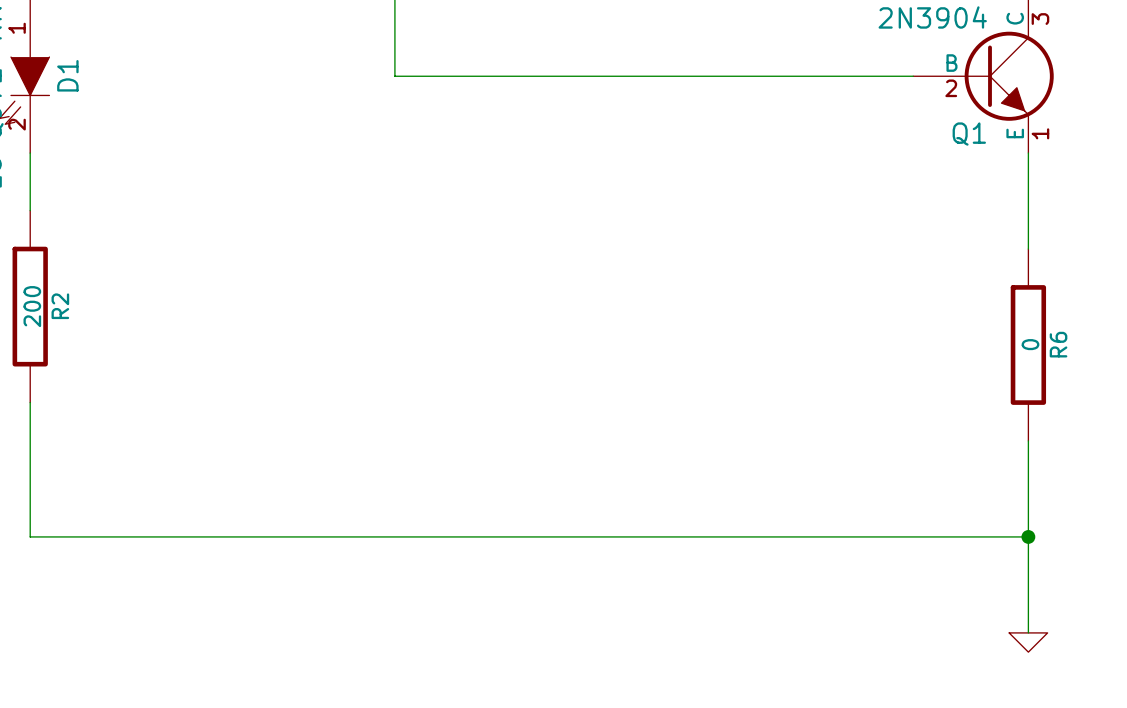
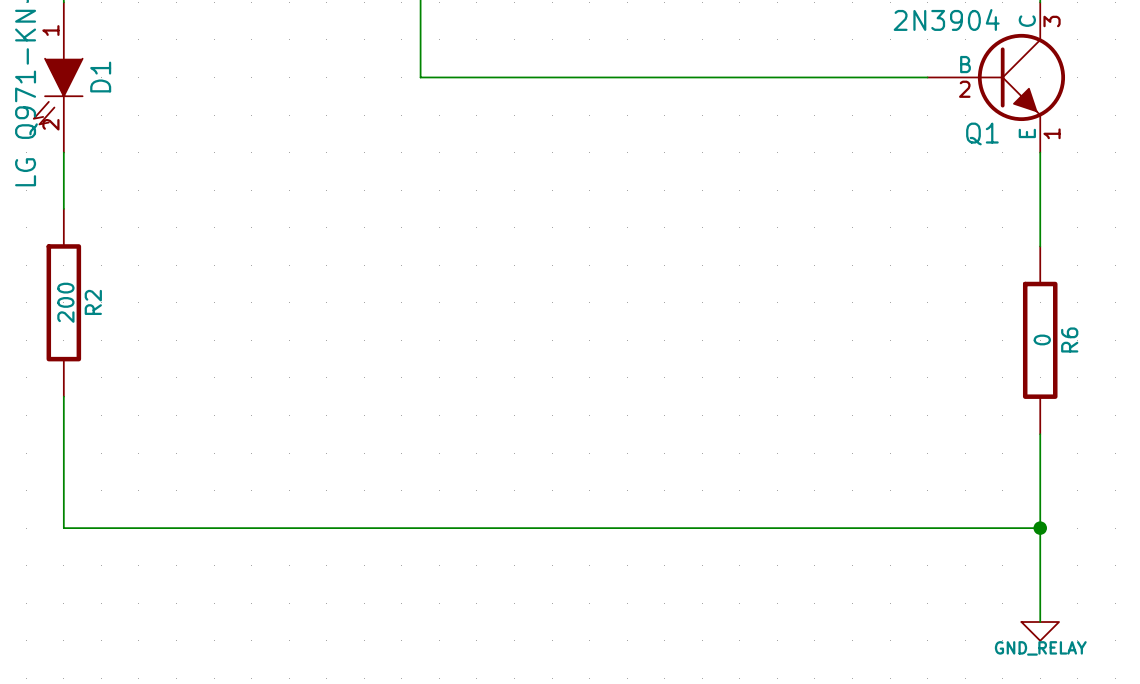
power symbol text: none -> GND_RELAY (1040, 648)

